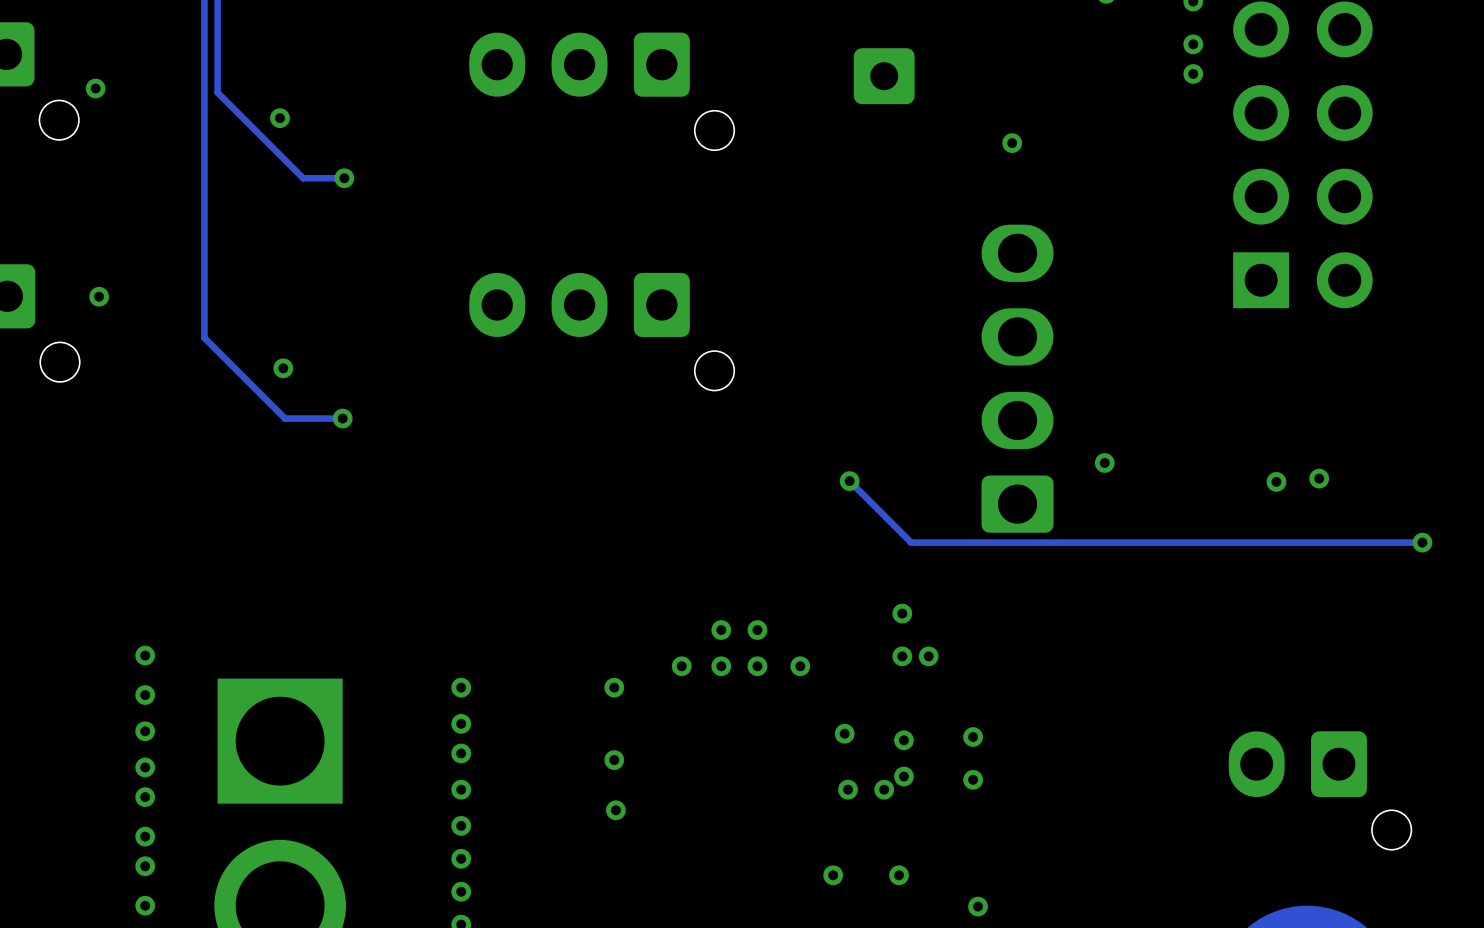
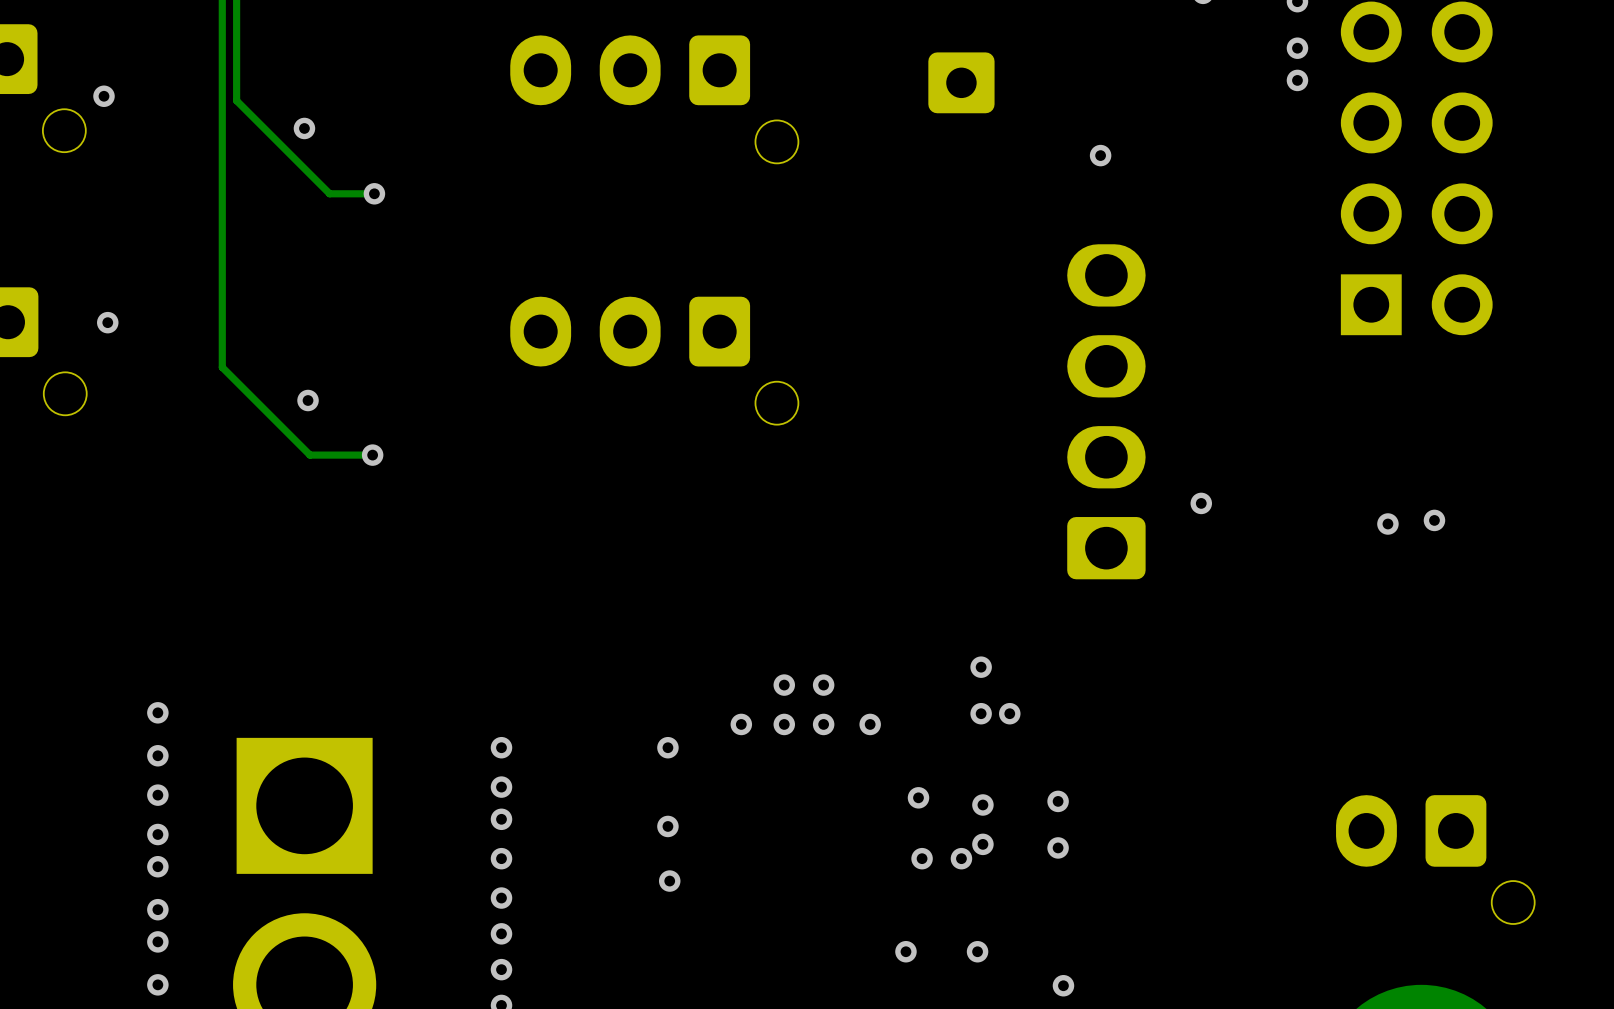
track: (849, 481) (911, 542) (1422, 542) -> none
via: (849, 481) -> none
via: (1422, 542) -> none

